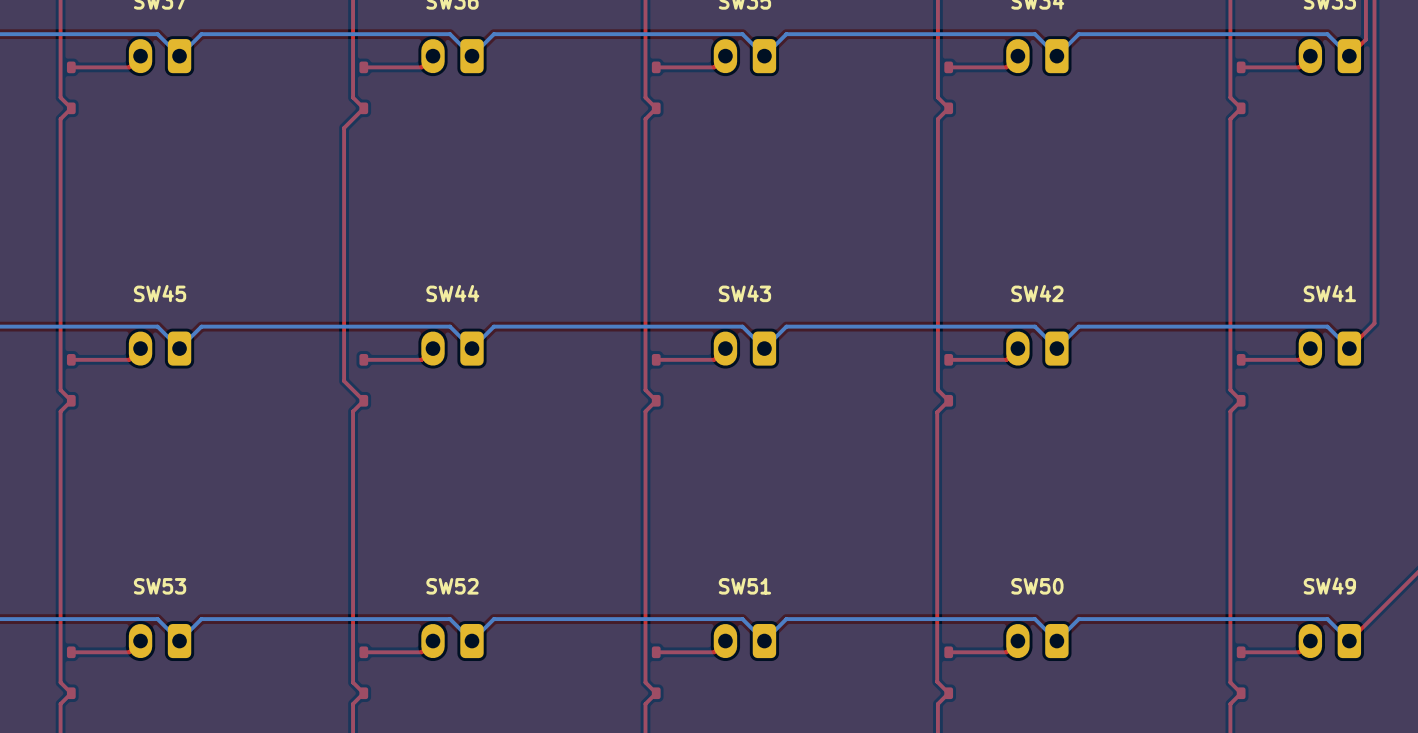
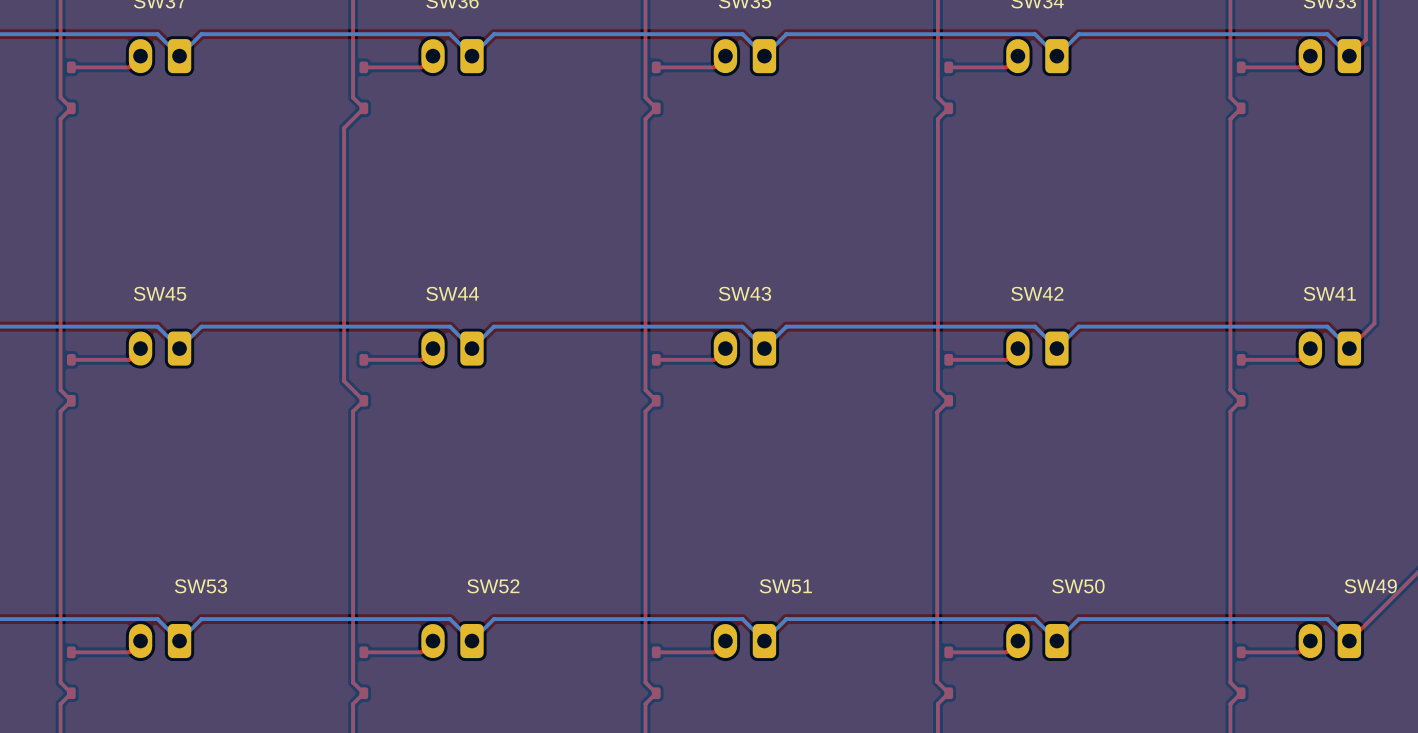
text position: SW53 (160, 586) -> SW53 (200, 586)
text position: SW52 (452, 586) -> SW52 (493, 586)
text position: SW51 (744, 586) -> SW51 (785, 586)
text position: SW50 (1037, 586) -> SW50 (1078, 586)
text position: SW49 (1329, 586) -> SW49 (1370, 586)

